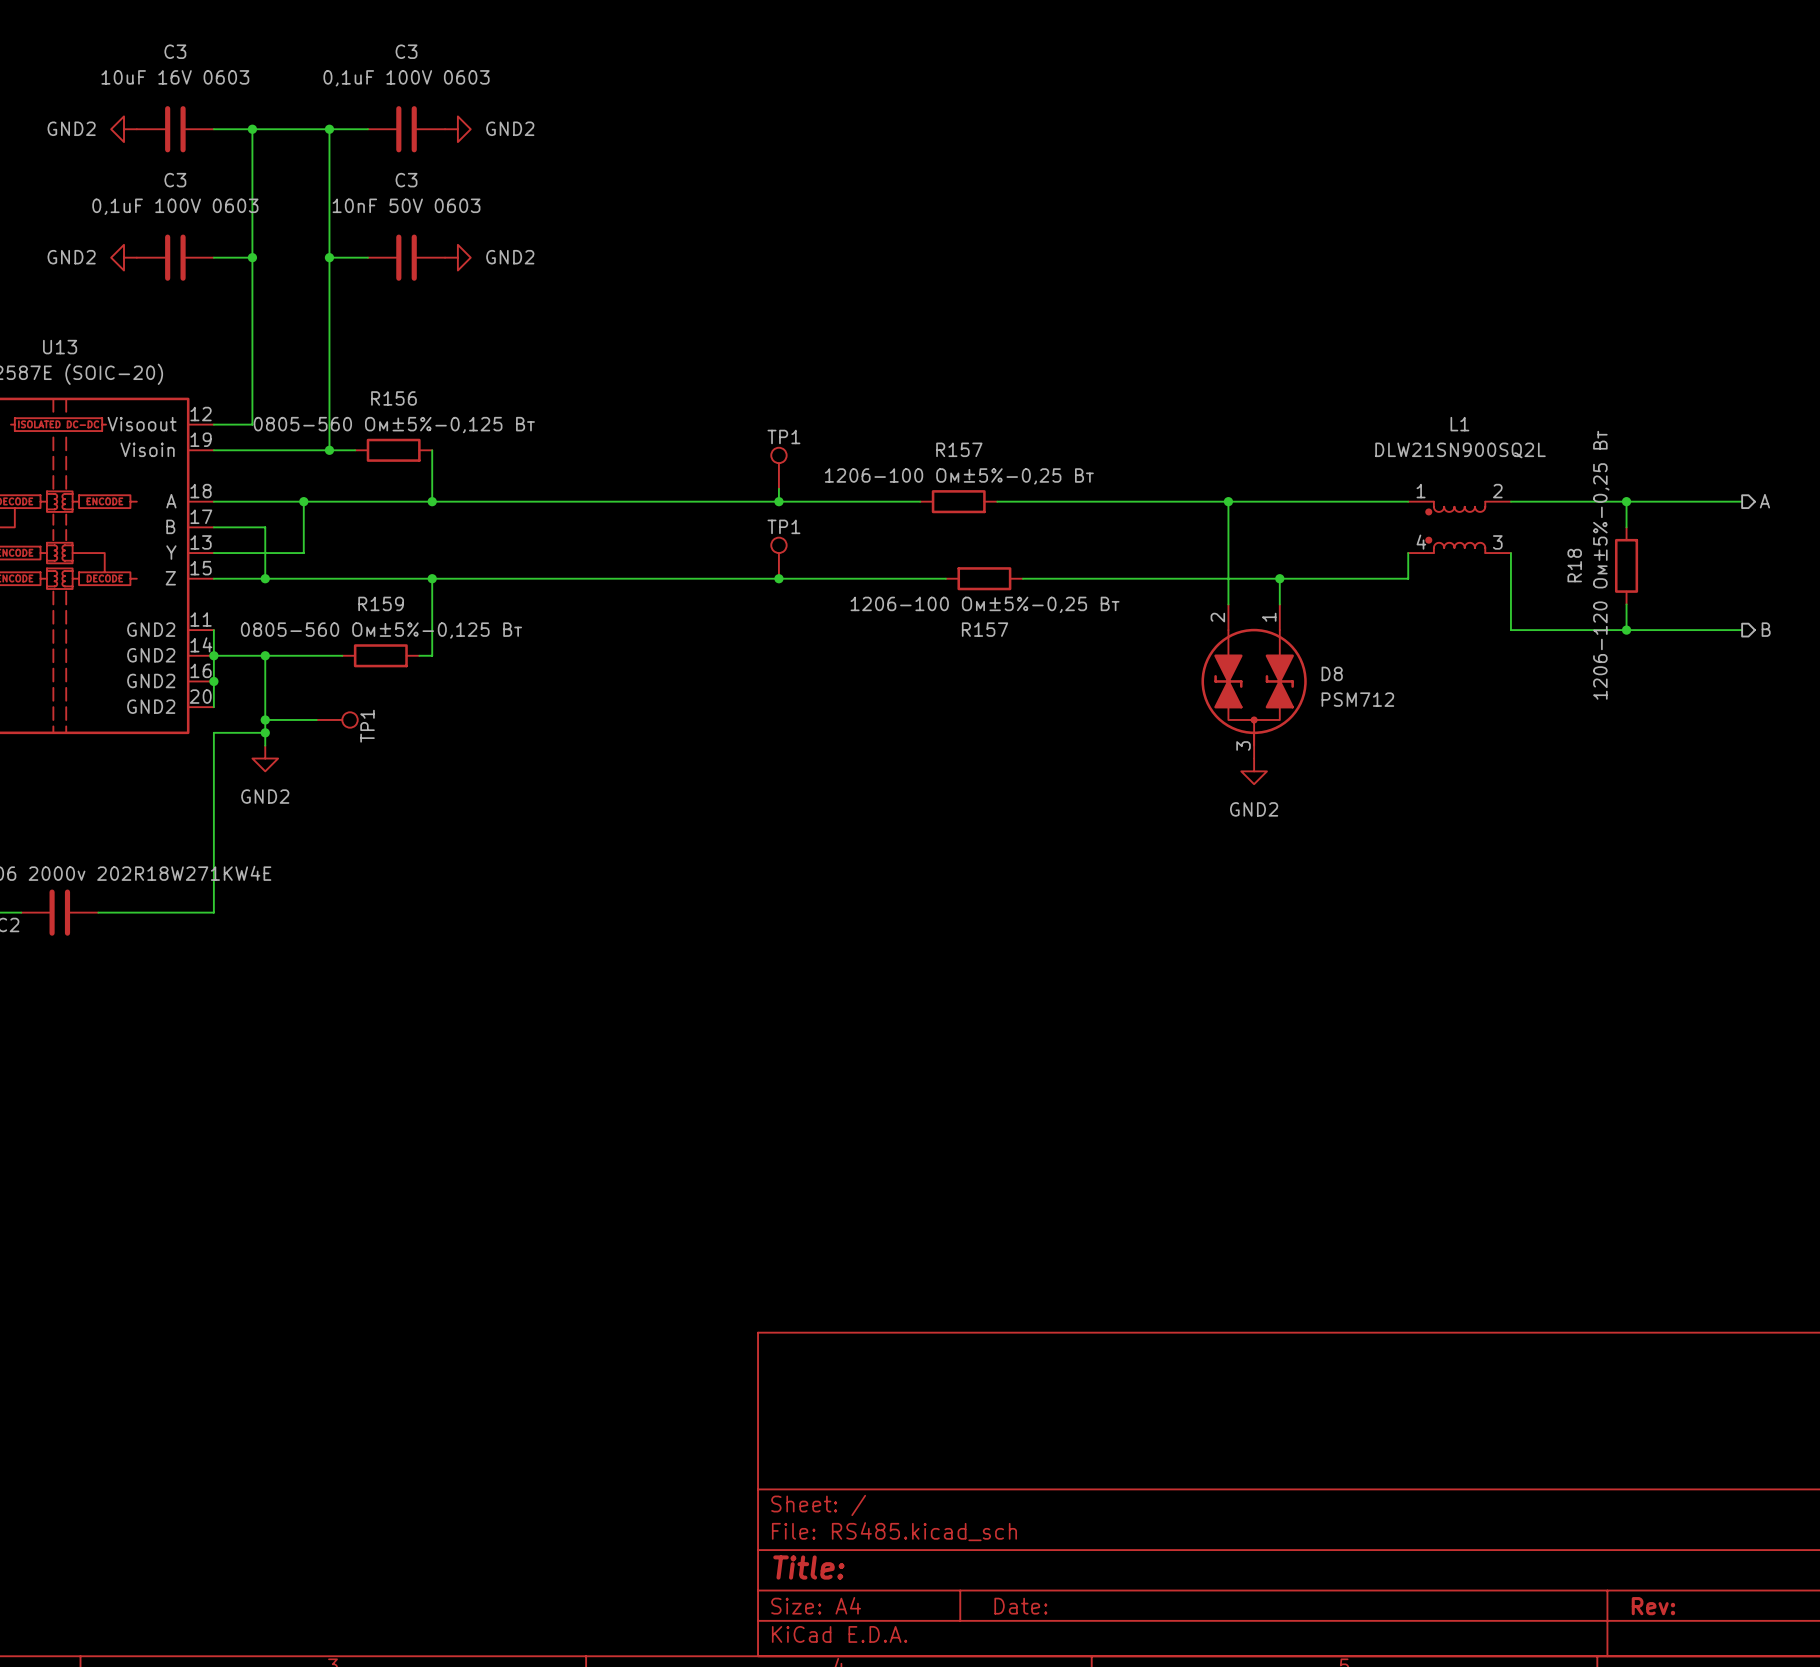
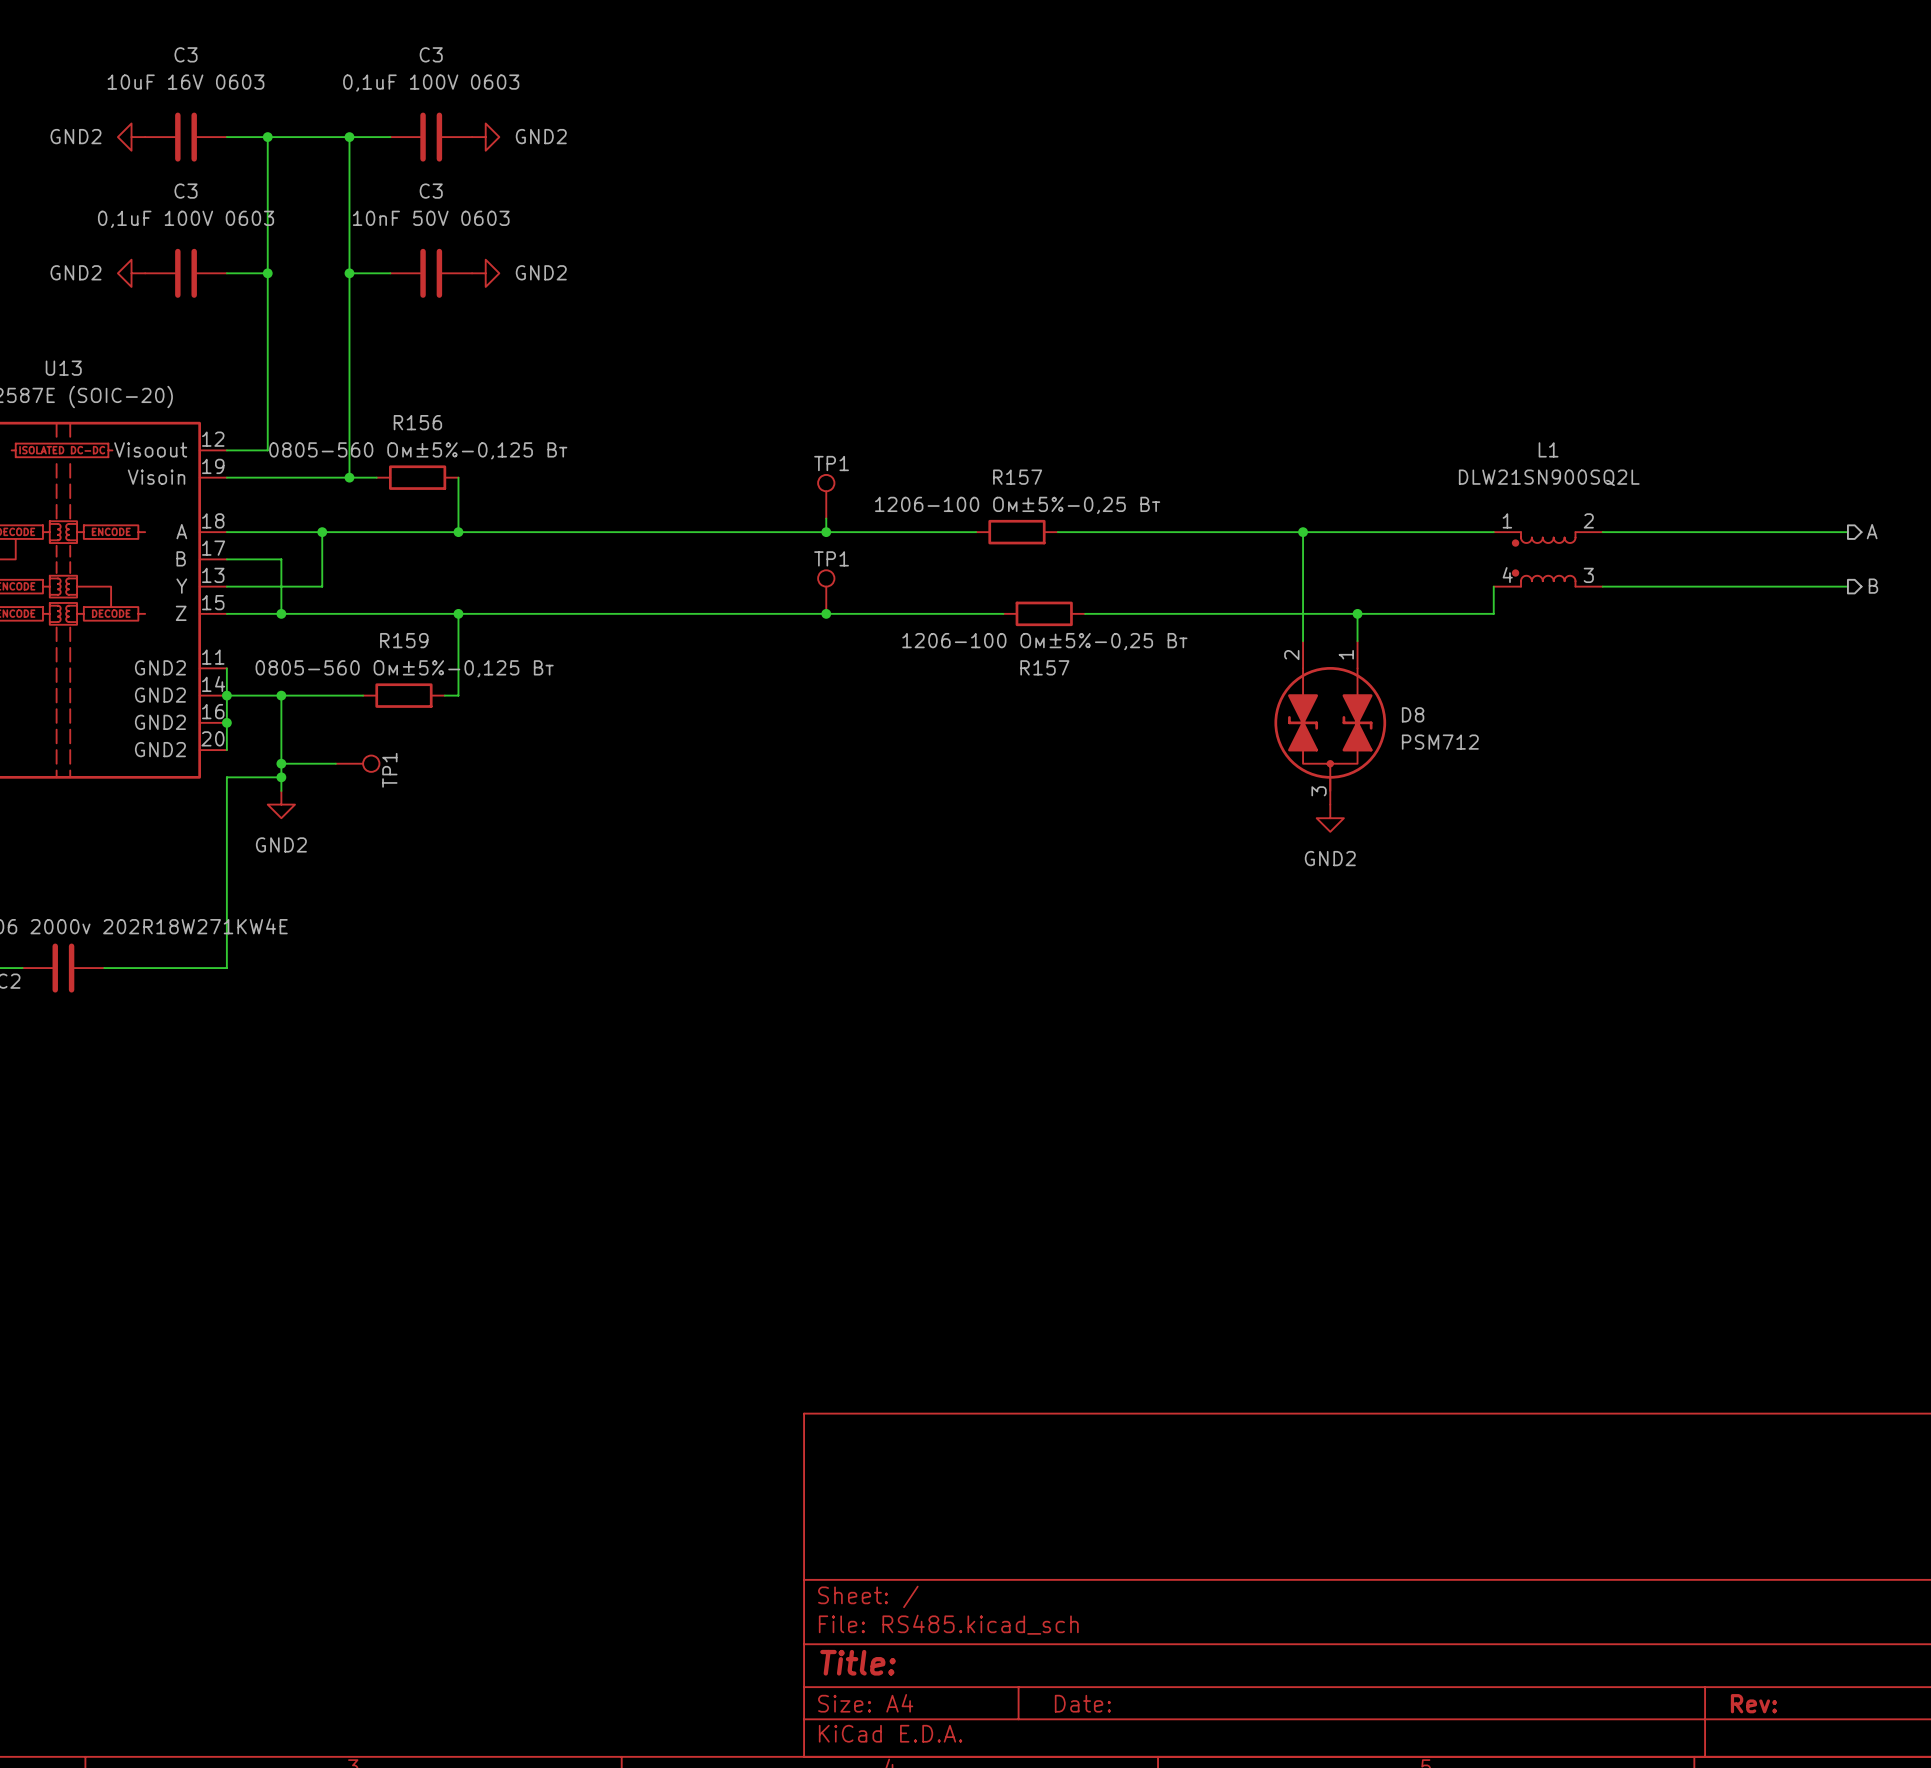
wire: (1626, 501) (1626, 527) -> none
junction: (1626, 501) -> none
wire: (1510, 553) (1510, 630) (1742, 630) -> (1602, 586) (1847, 586)
R18: 1206-120 Ом±5%-0,25 Вт (1626, 565) -> none
wire: (1626, 604) (1626, 630) -> none
hierarchical label position: B (1766, 629) -> B (1873, 586)
junction: (1626, 630) -> none

